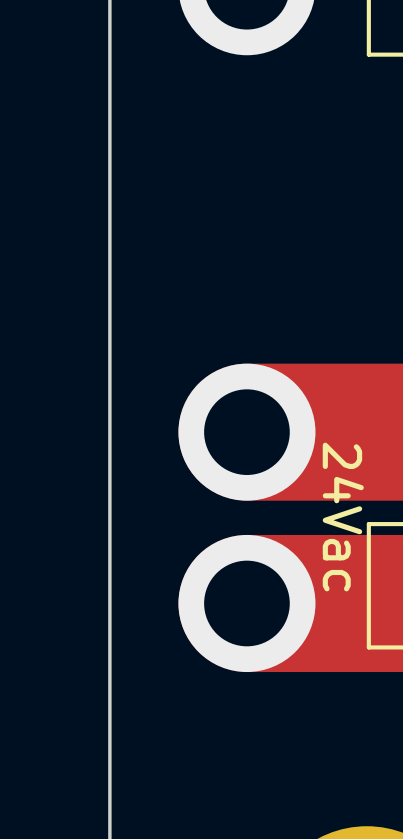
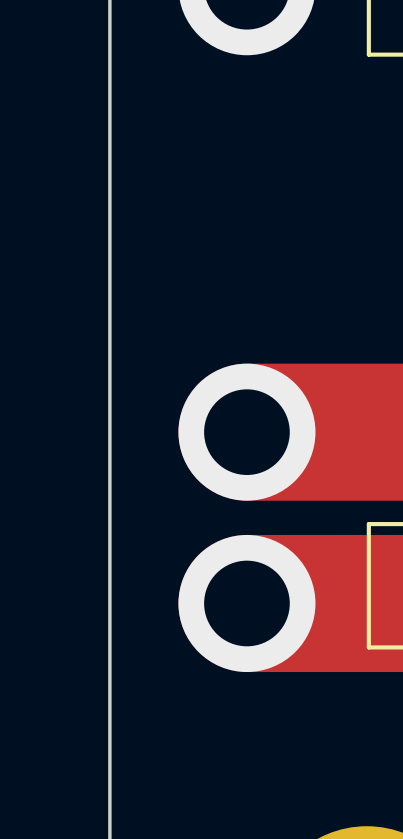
text: 24Vac (343, 517) -> none

